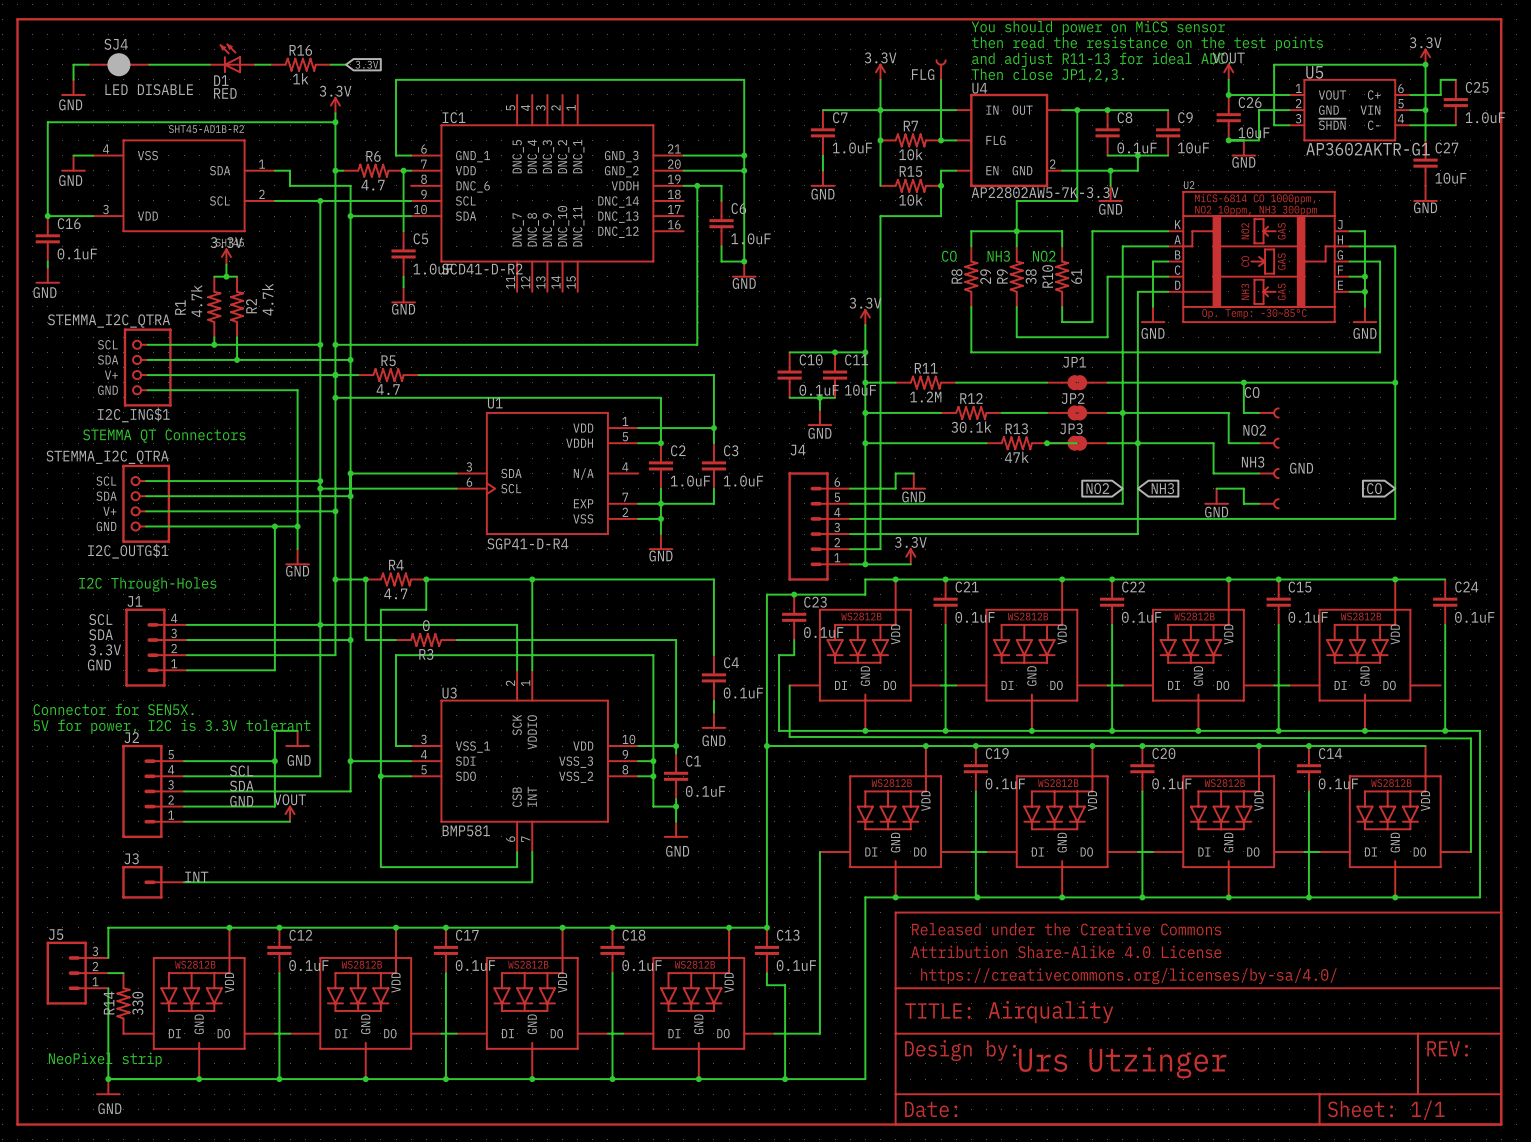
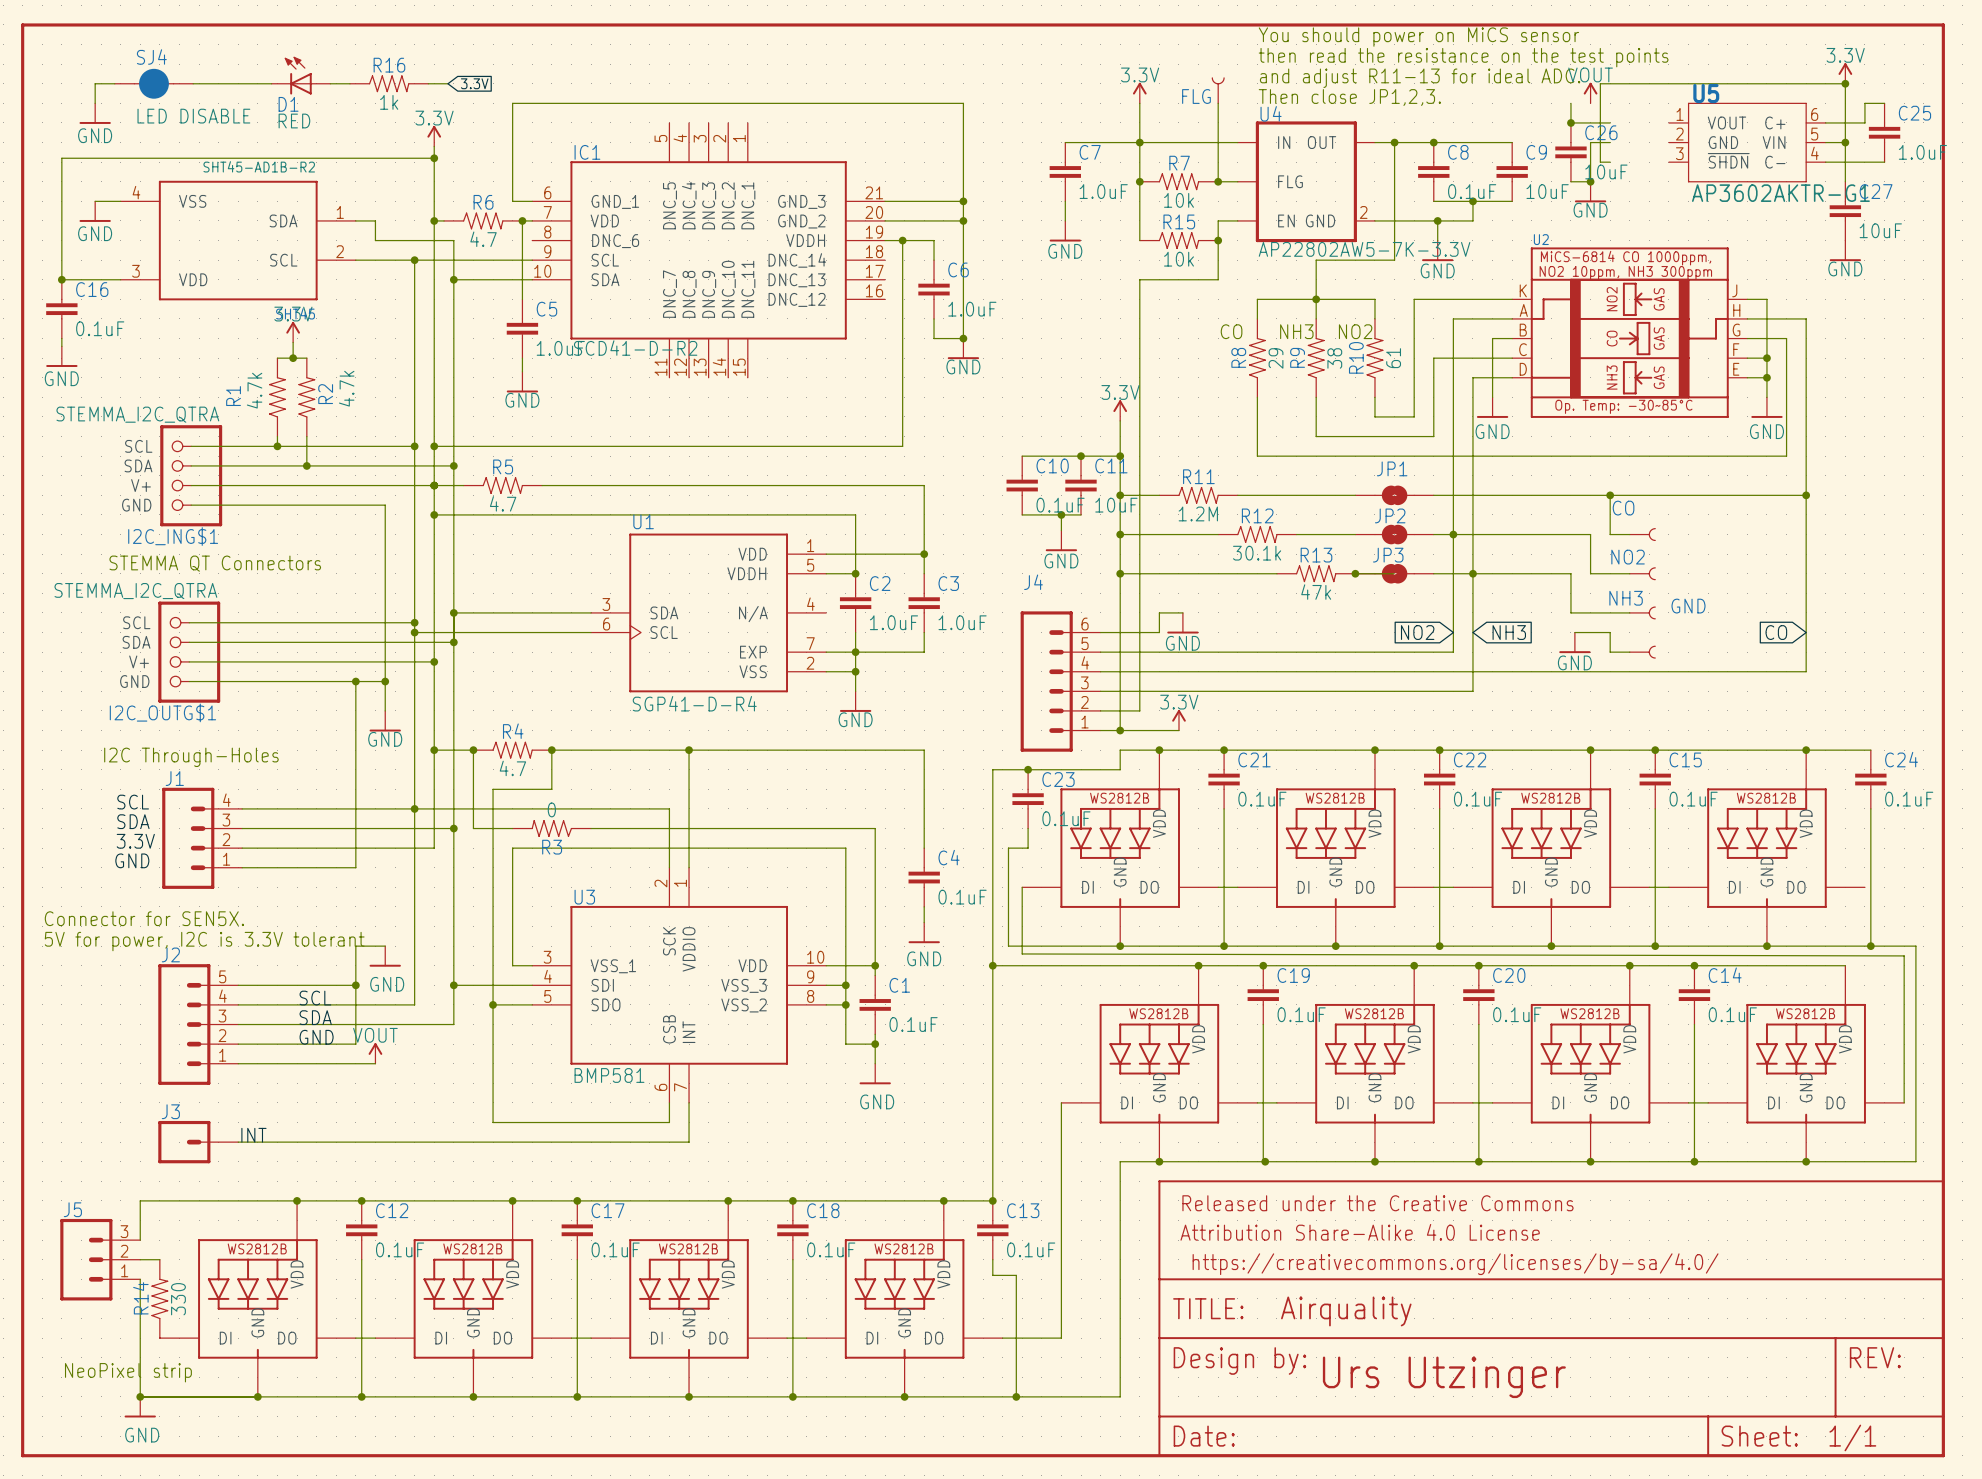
wire: (1274, 64) (1274, 125) (1289, 125) -> (1649, 83) (1600, 83) (1600, 162) (1610, 162)
wire: (1228, 79) (1228, 94) -> (1570, 103) (1570, 122) (1590, 122)
junction position: (1228, 94) -> (1570, 122)
wire: (1243, 94) (1289, 94) -> none
wire: none -> (1610, 142) (1590, 142) (1590, 181) (1570, 181)
wire: (1289, 110) (1258, 110) (1258, 140) (1228, 140) -> none
C26 position: (1228, 117) -> (1570, 152)
power symbol position: GND (1243, 148) -> GND (1590, 192)

